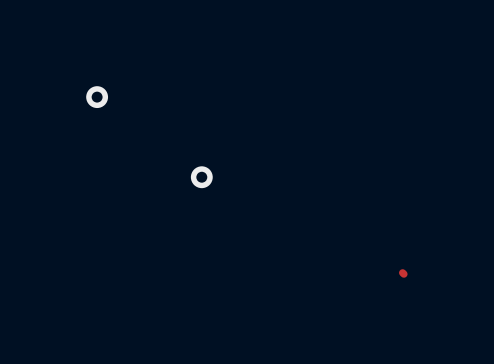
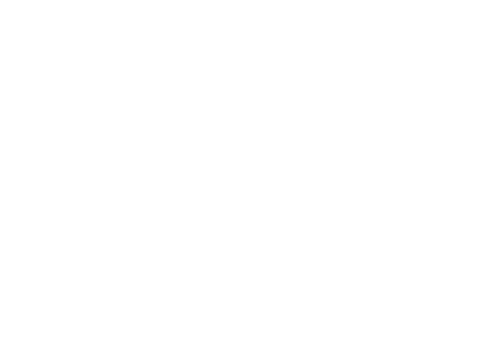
via: (97, 97) -> none
via: (201, 177) -> none
track: (402, 272) (403, 274) -> none

